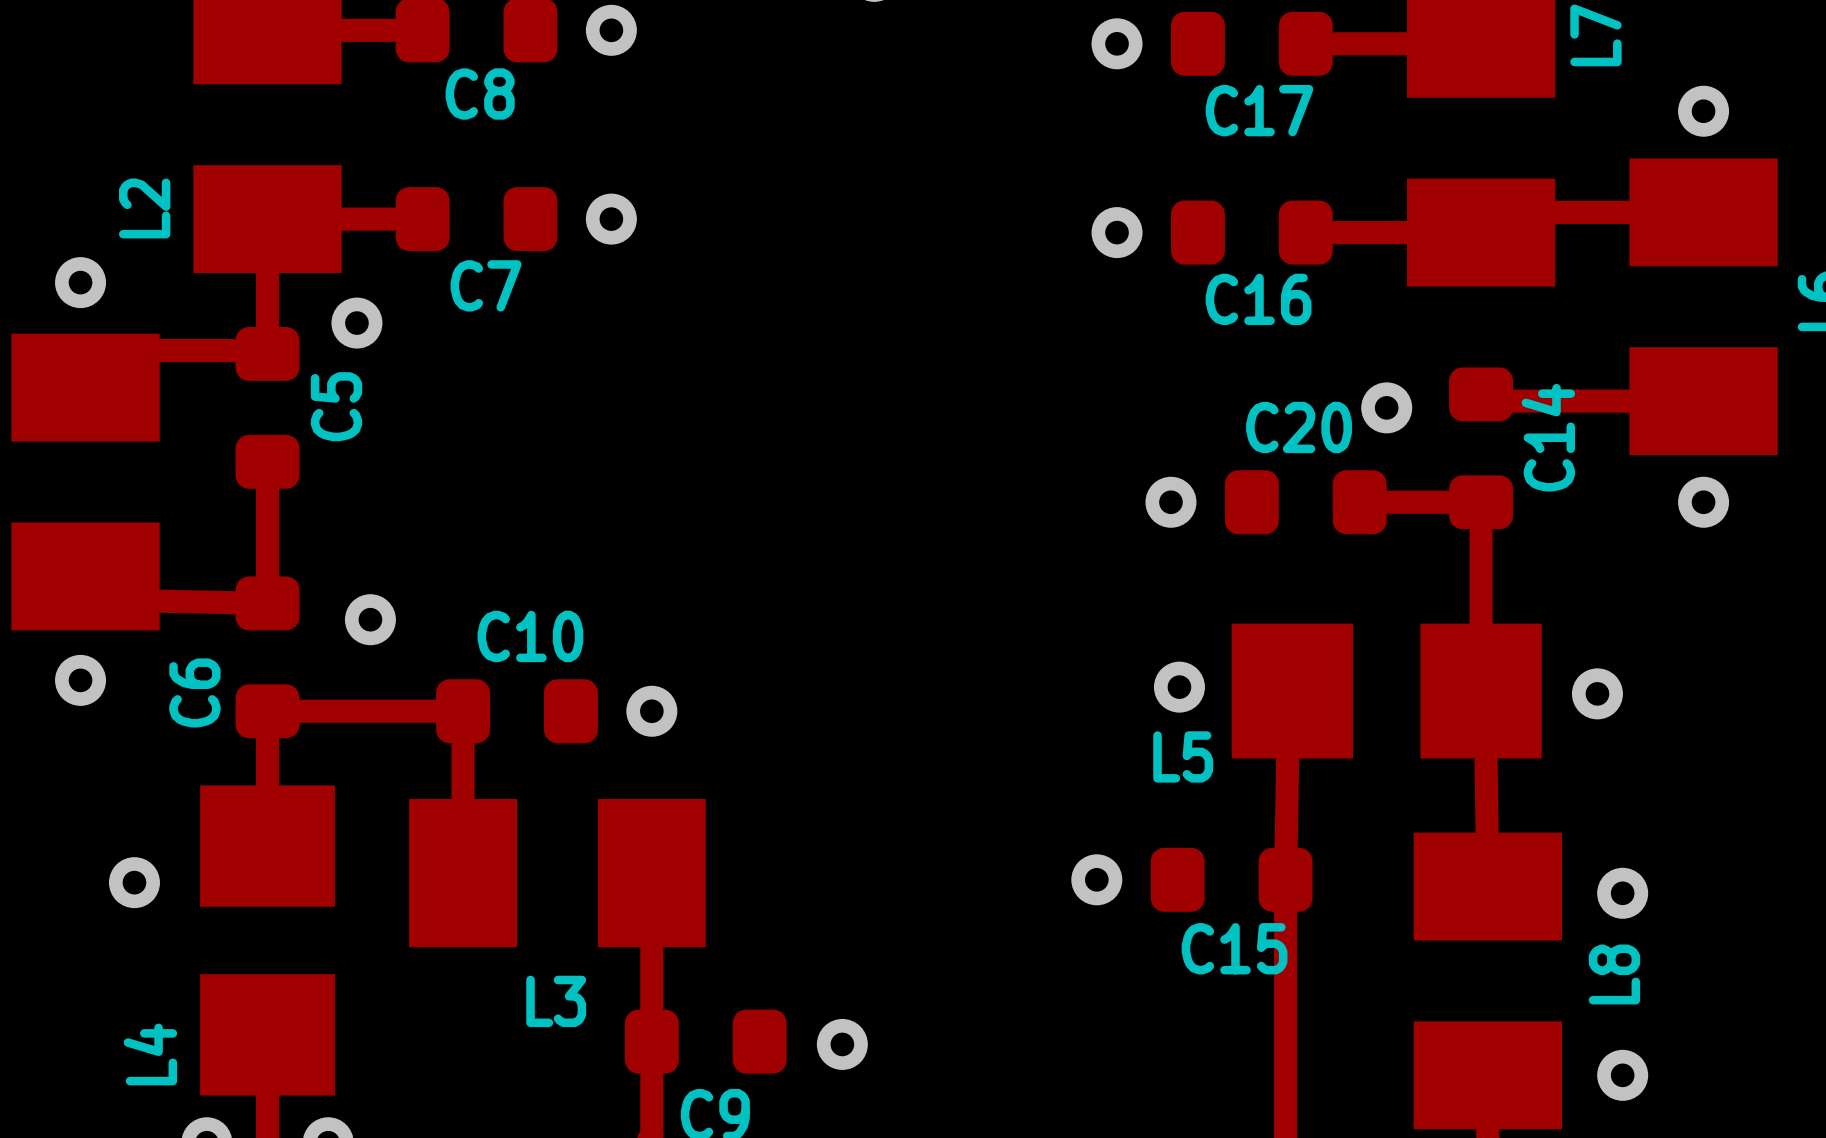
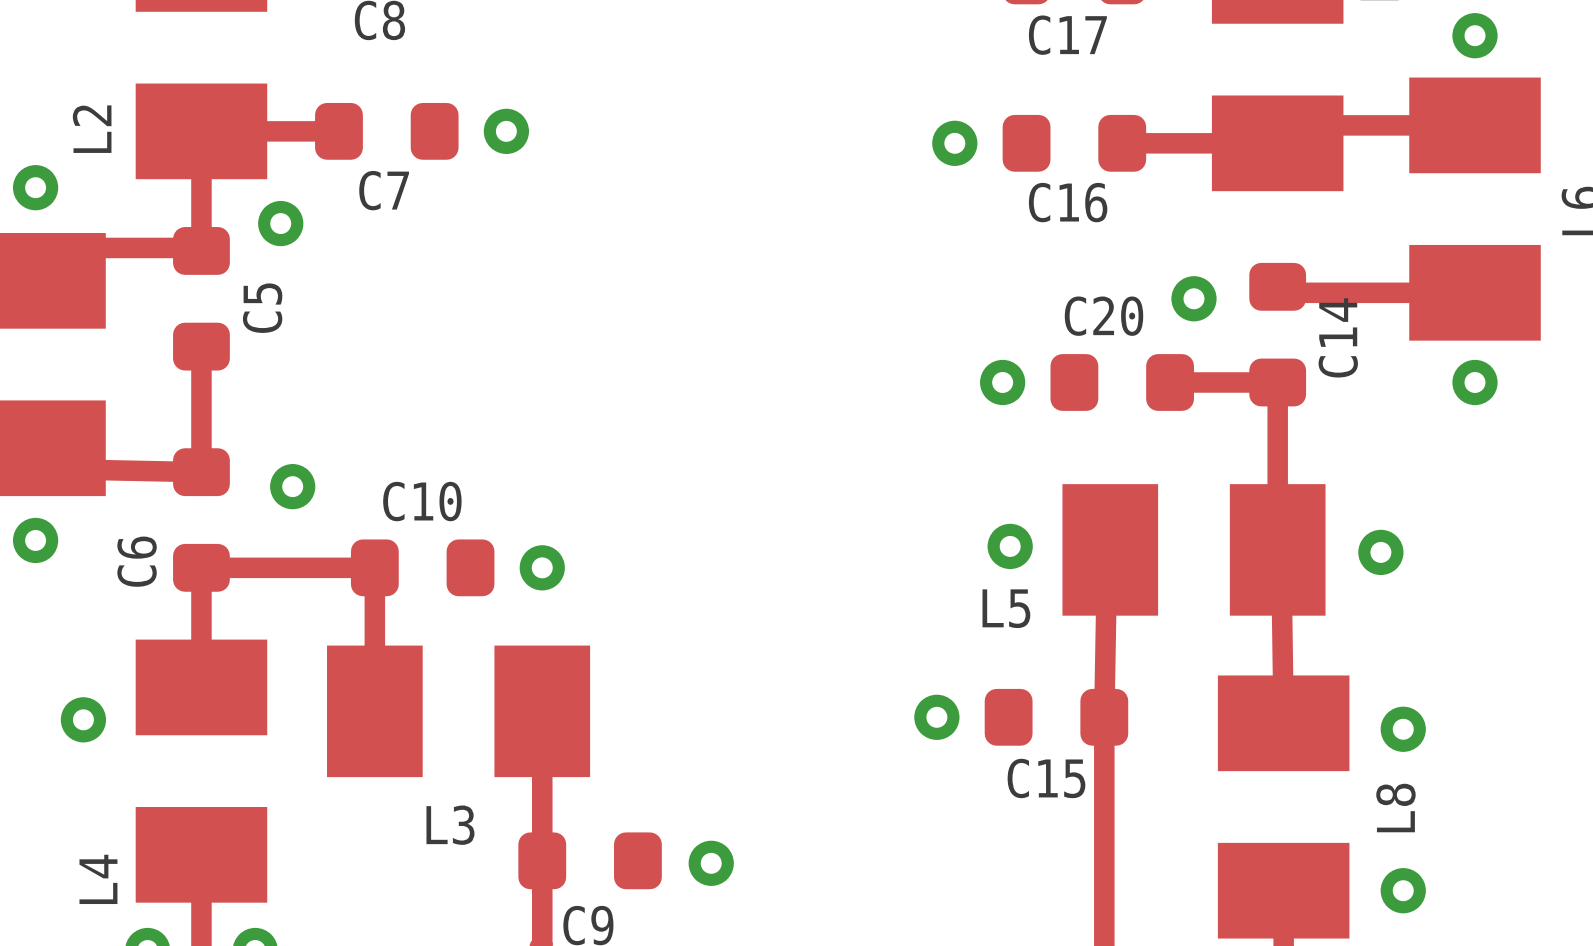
L5 footprint: [1231, 623, 1542, 759] -> [1062, 484, 1326, 616]
L4 footprint: [200, 785, 335, 1096] -> [135, 639, 268, 903]

